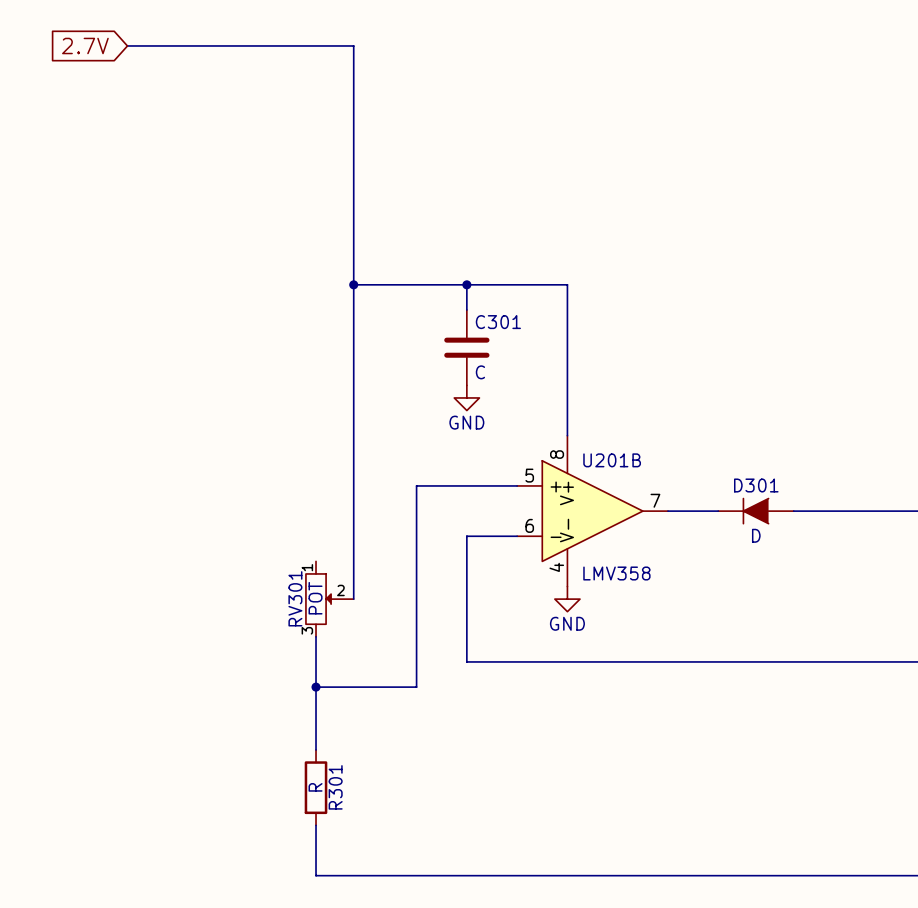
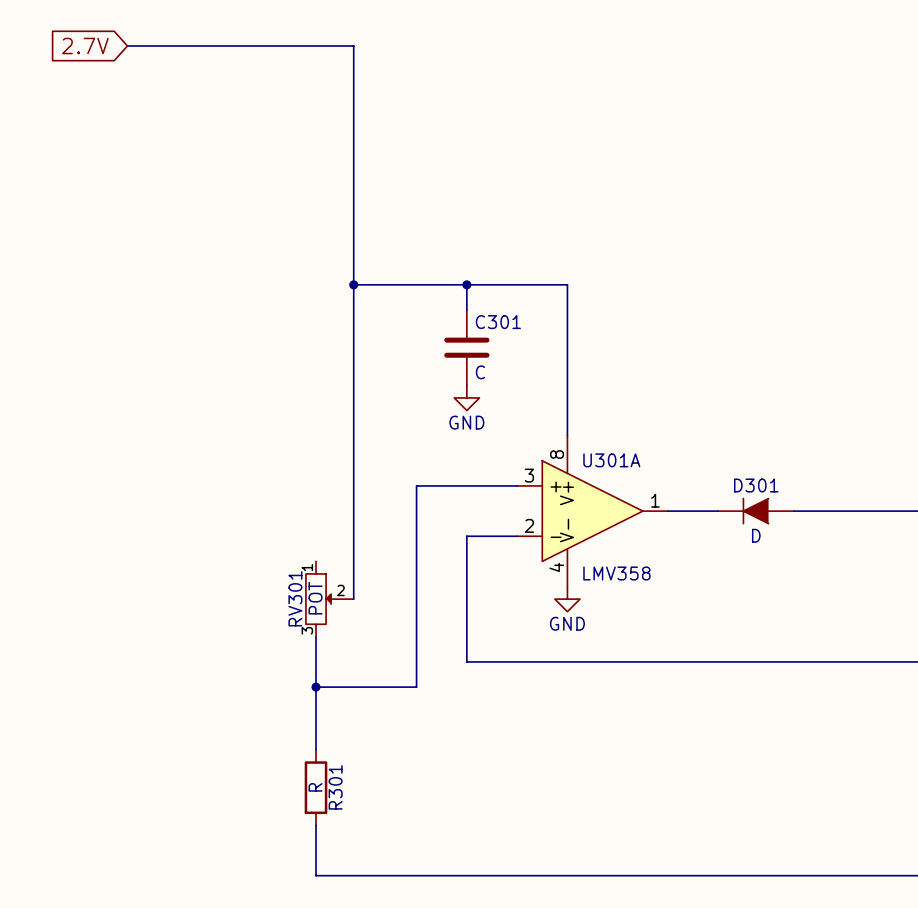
U201B name: U201B (612, 460) -> U301A (611, 460)
U201B pin number: 5 (529, 475) -> 3 (529, 475)
U201B pin number: 7 (655, 500) -> 1 (655, 500)
U201B pin number: 6 (529, 525) -> 2 (529, 525)

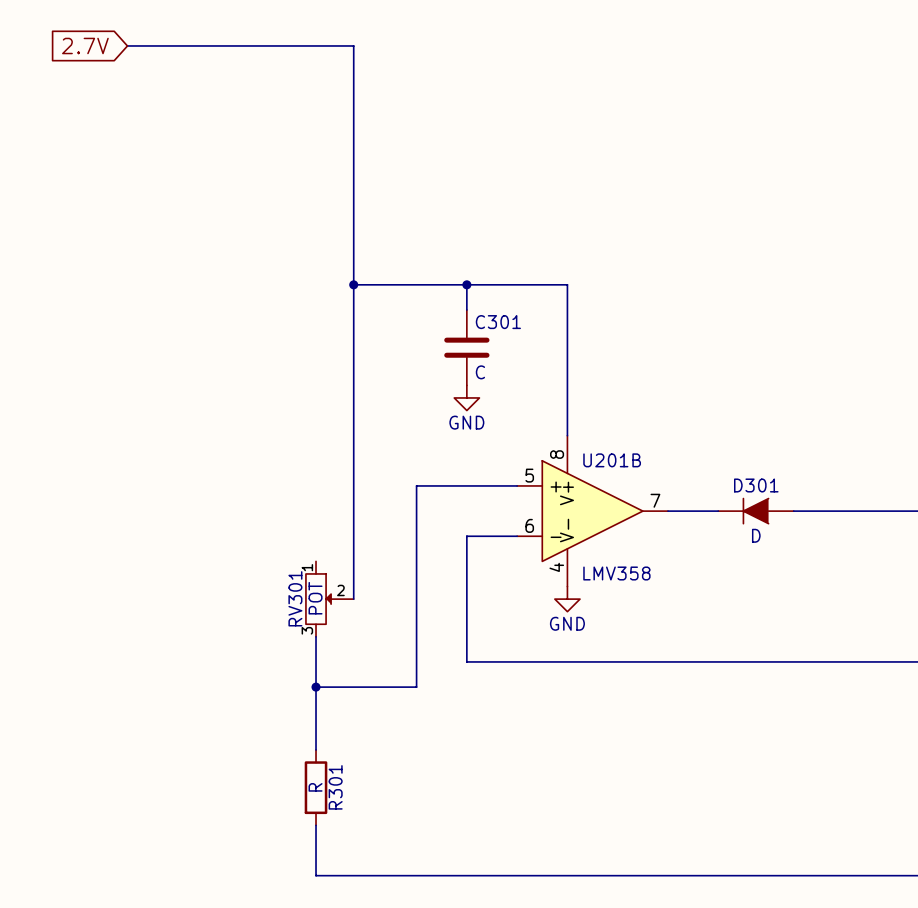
U301A name: U301A (611, 460) -> U201B (612, 460)
U301A pin number: 3 (529, 475) -> 5 (529, 475)
U301A pin number: 1 (655, 500) -> 7 (655, 500)
U301A pin number: 2 (529, 525) -> 6 (529, 525)

